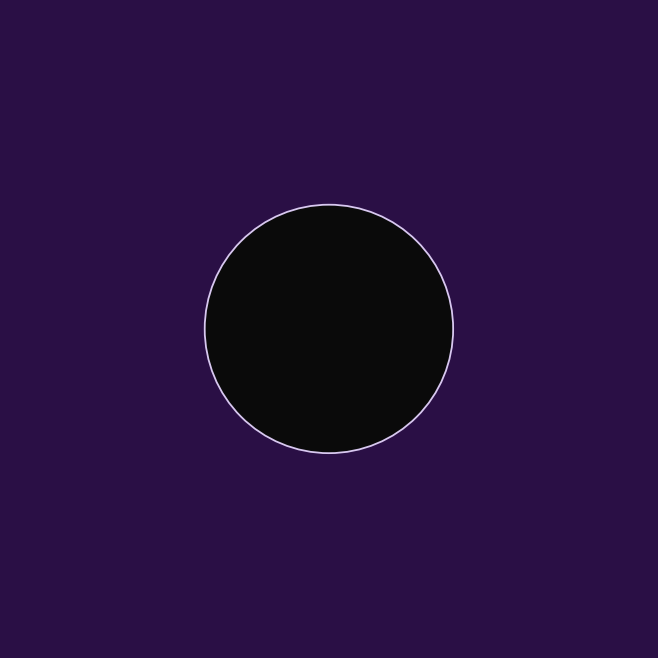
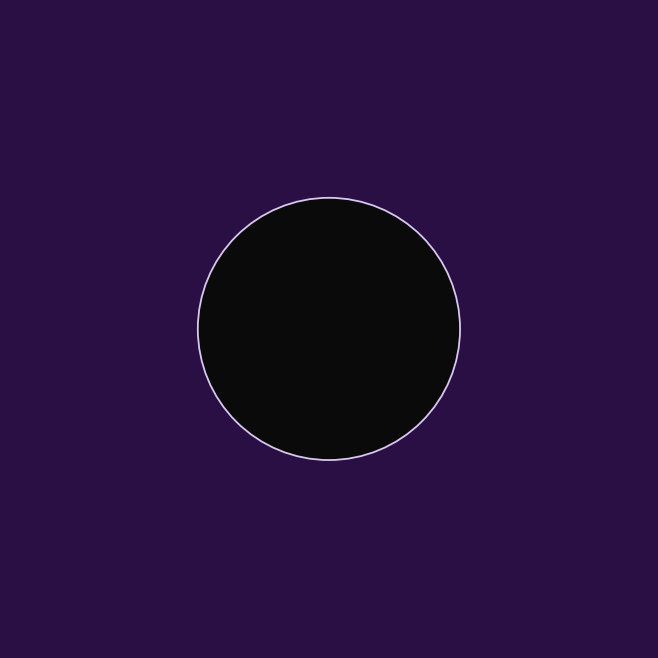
part footprint: [204, 204, 454, 454] -> [197, 197, 461, 461]

